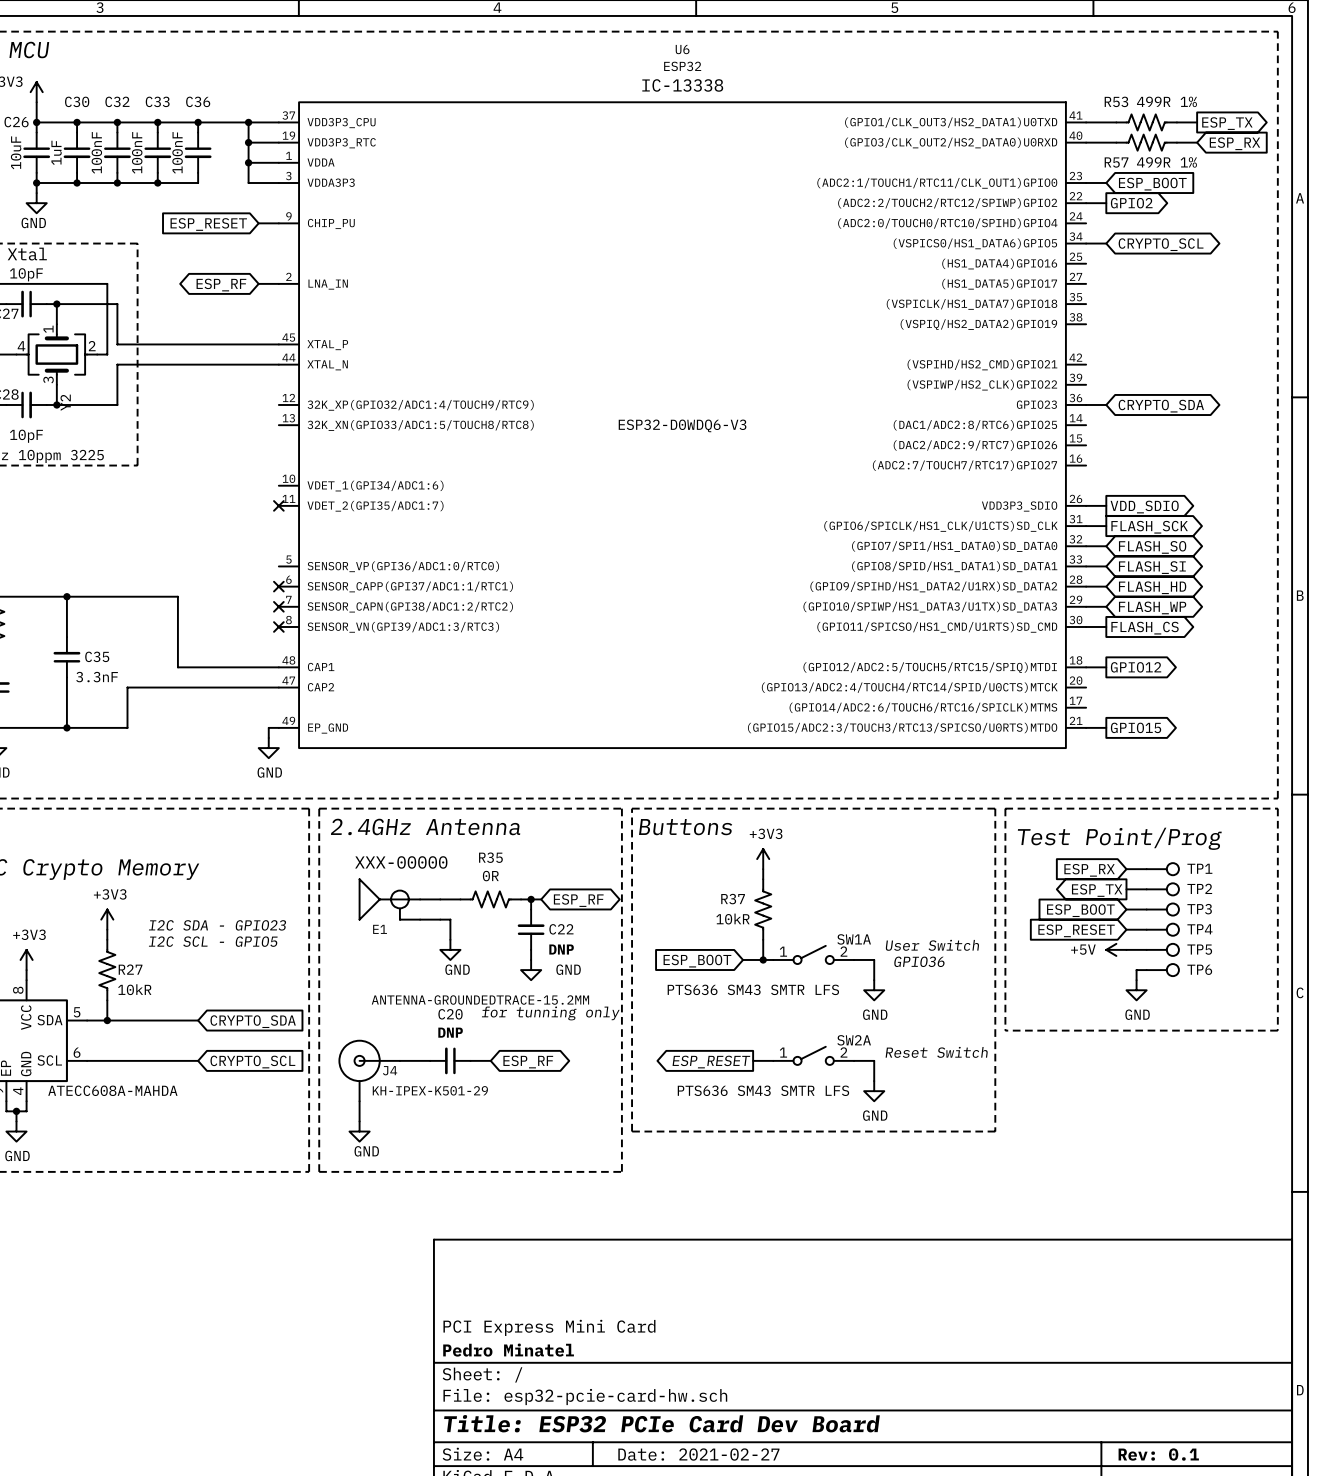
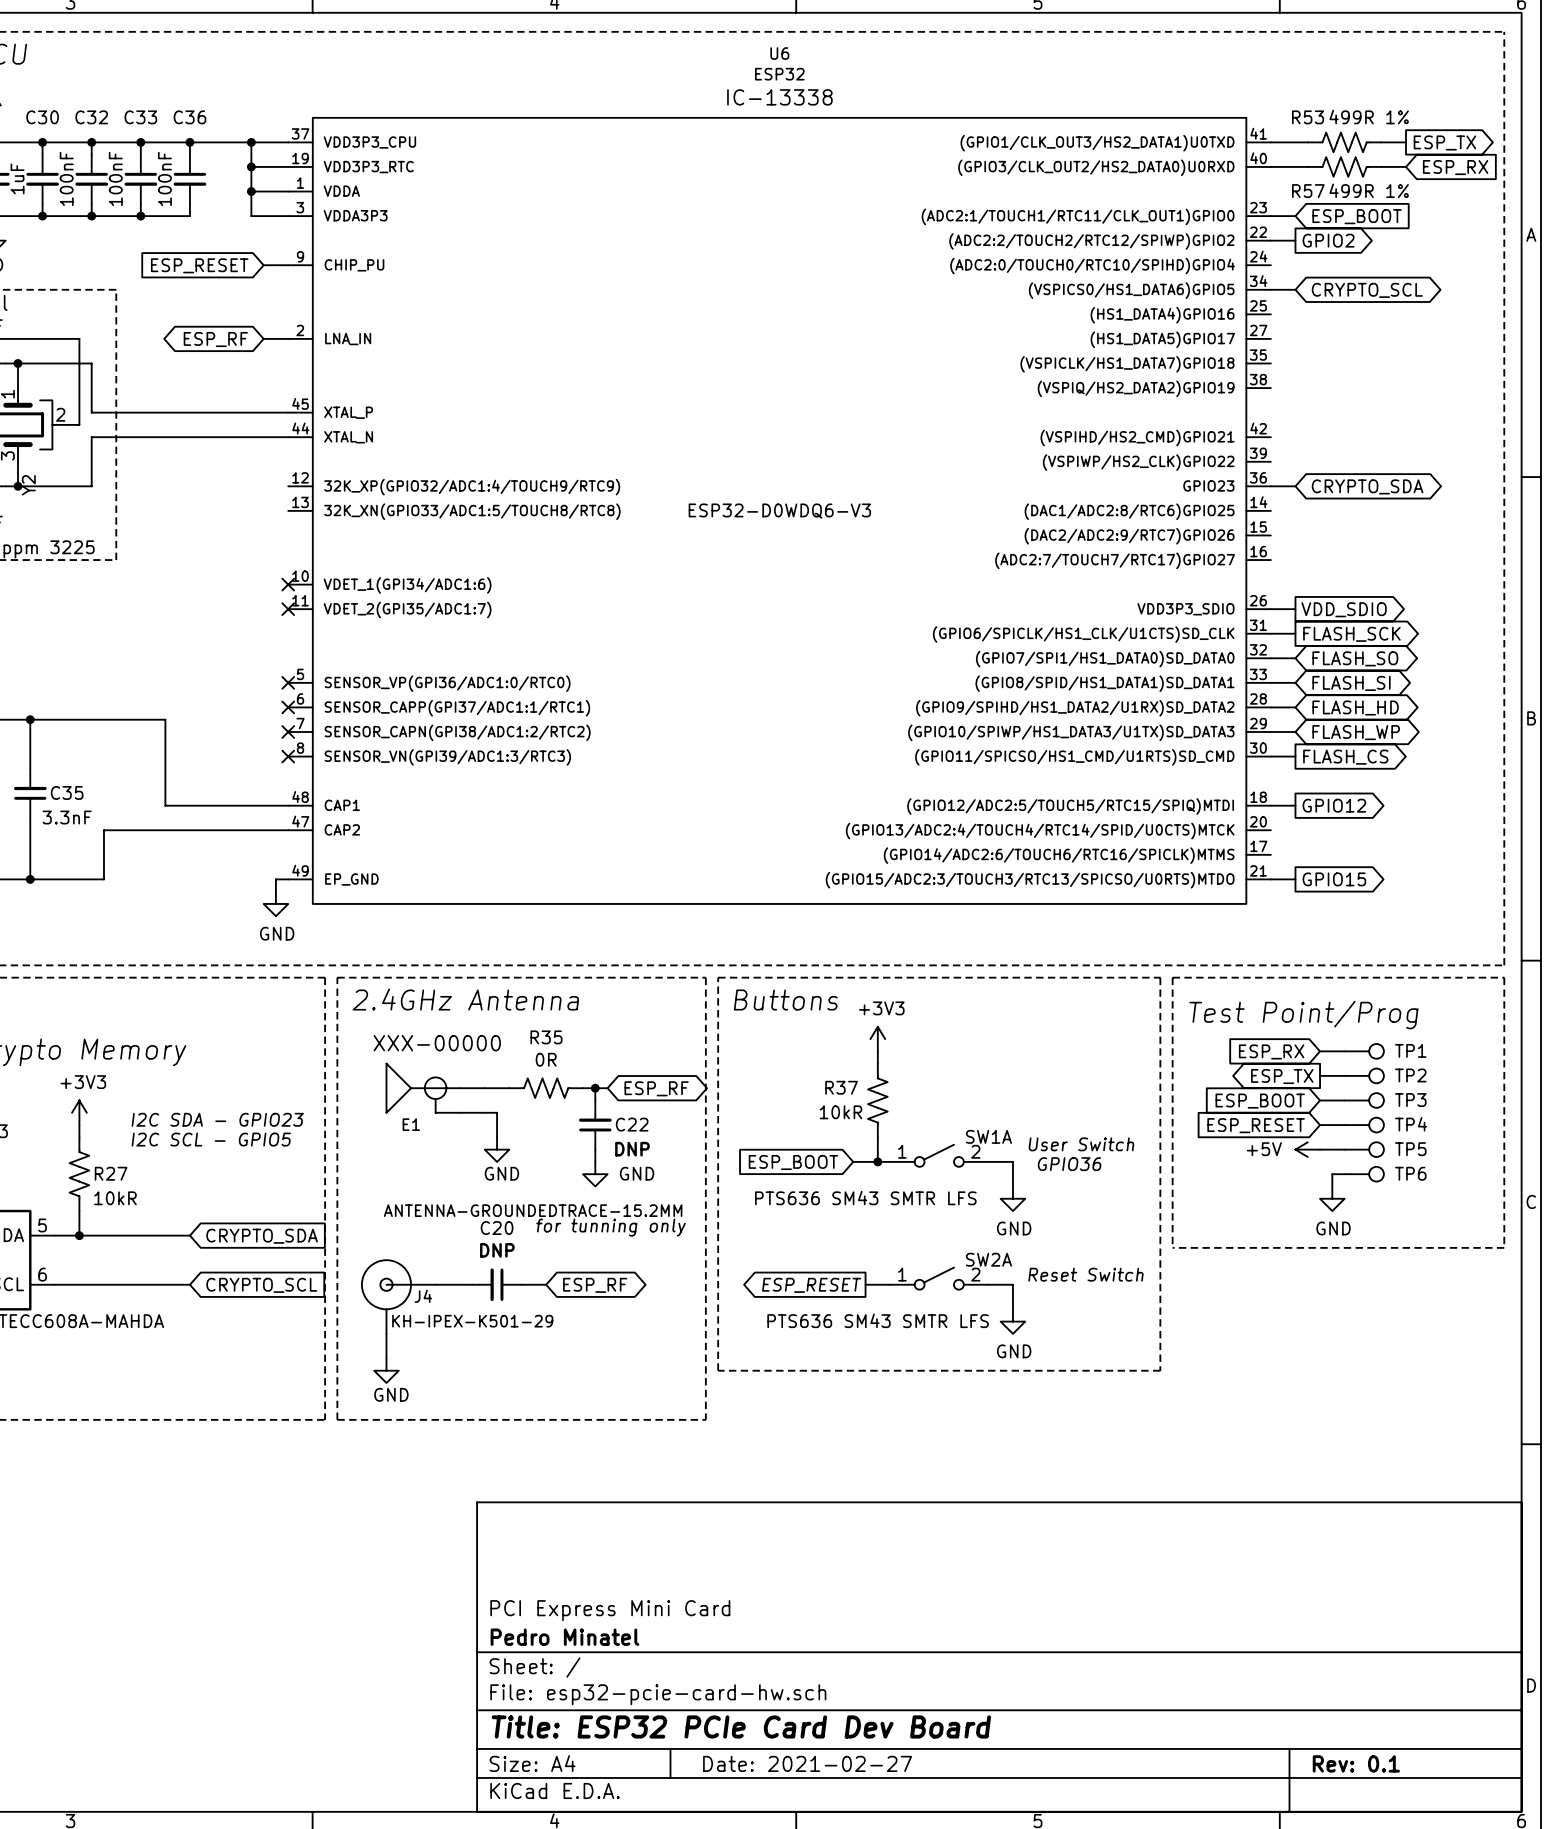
no-connect mark: none -> (288, 584)
no-connect mark: none -> (288, 682)

